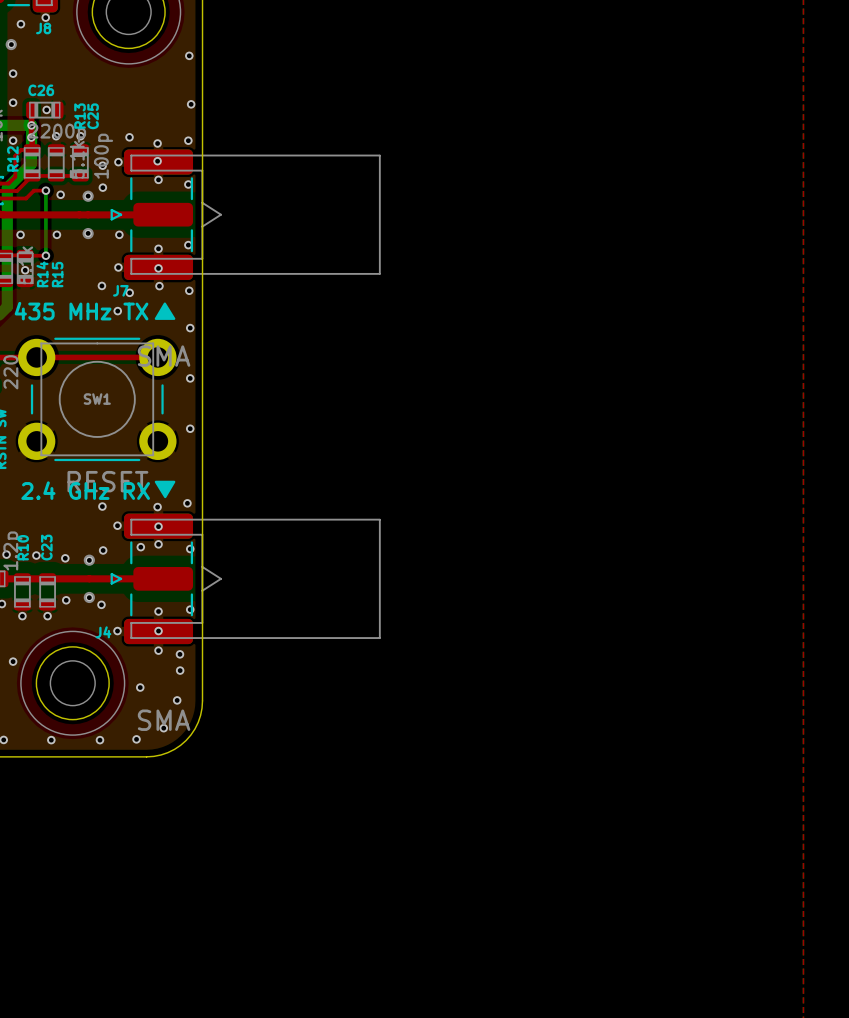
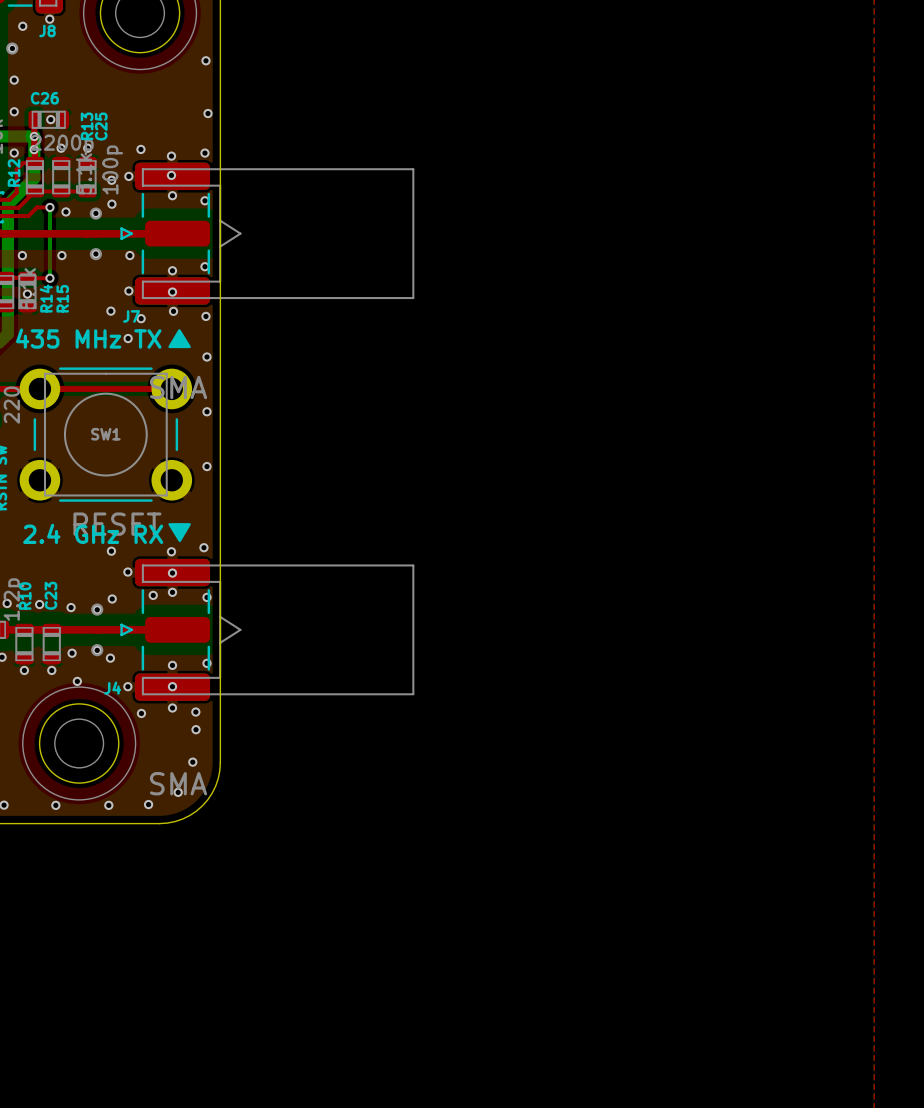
via: none -> (77, 681)
via: (13, 661) -> none
via position: (140, 687) -> (141, 713)

